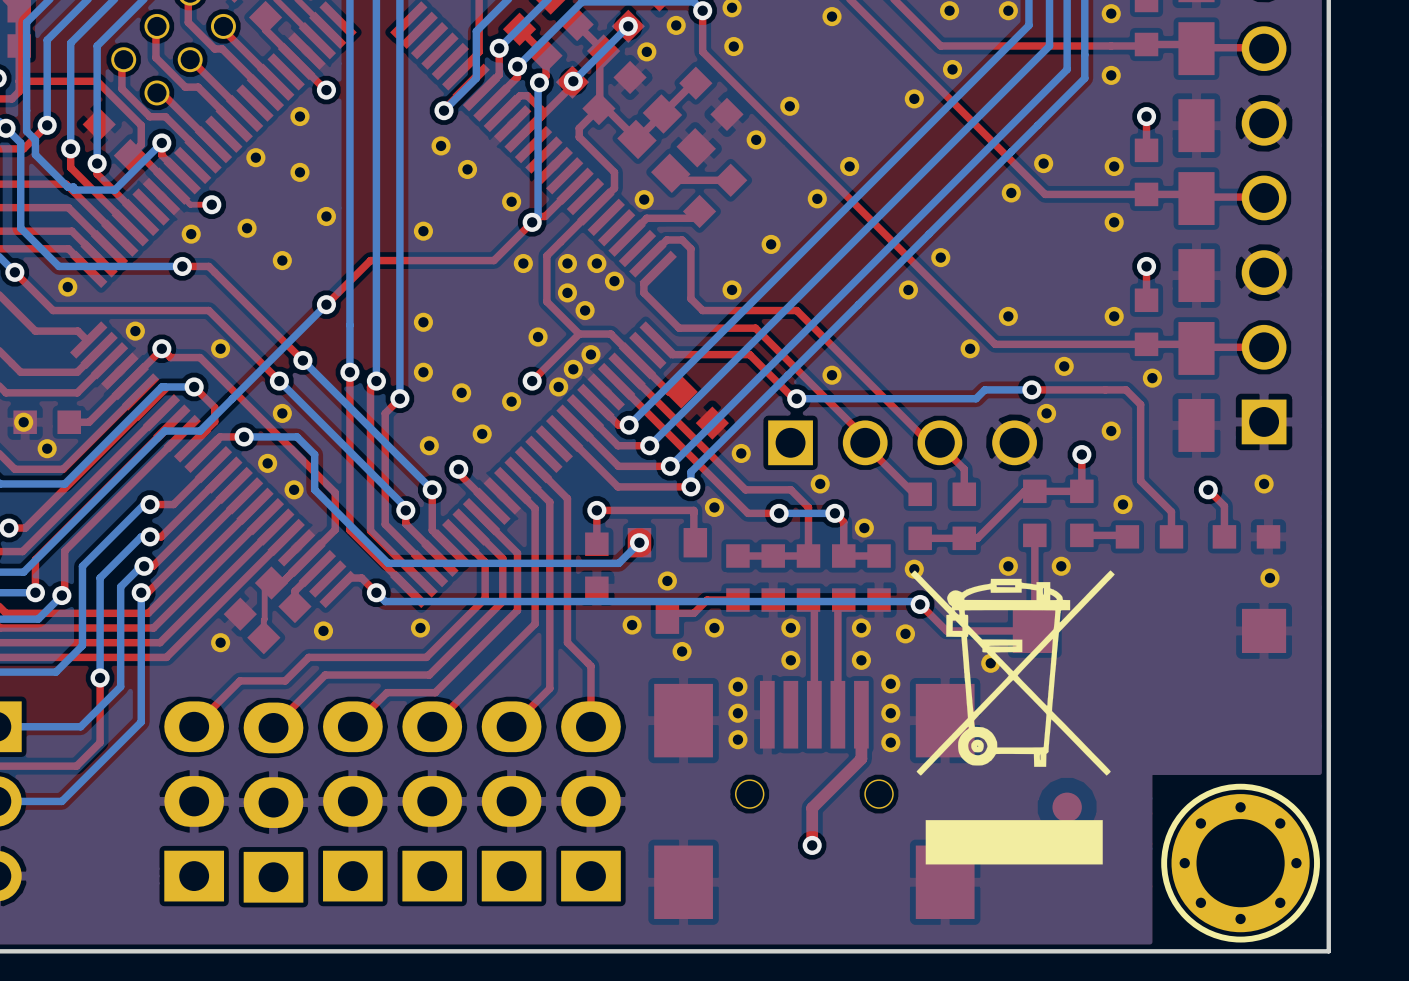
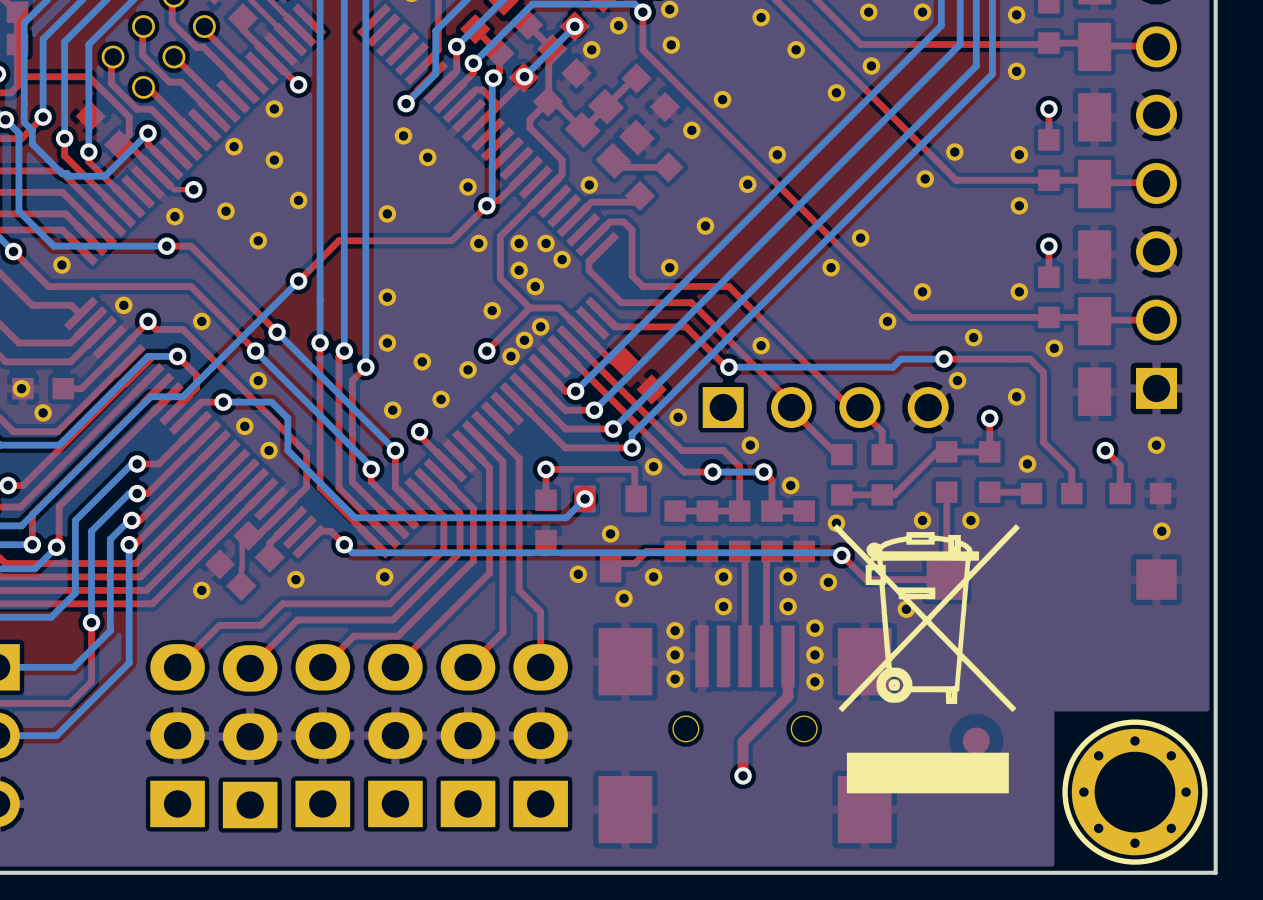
part: none -> (796, 49)

